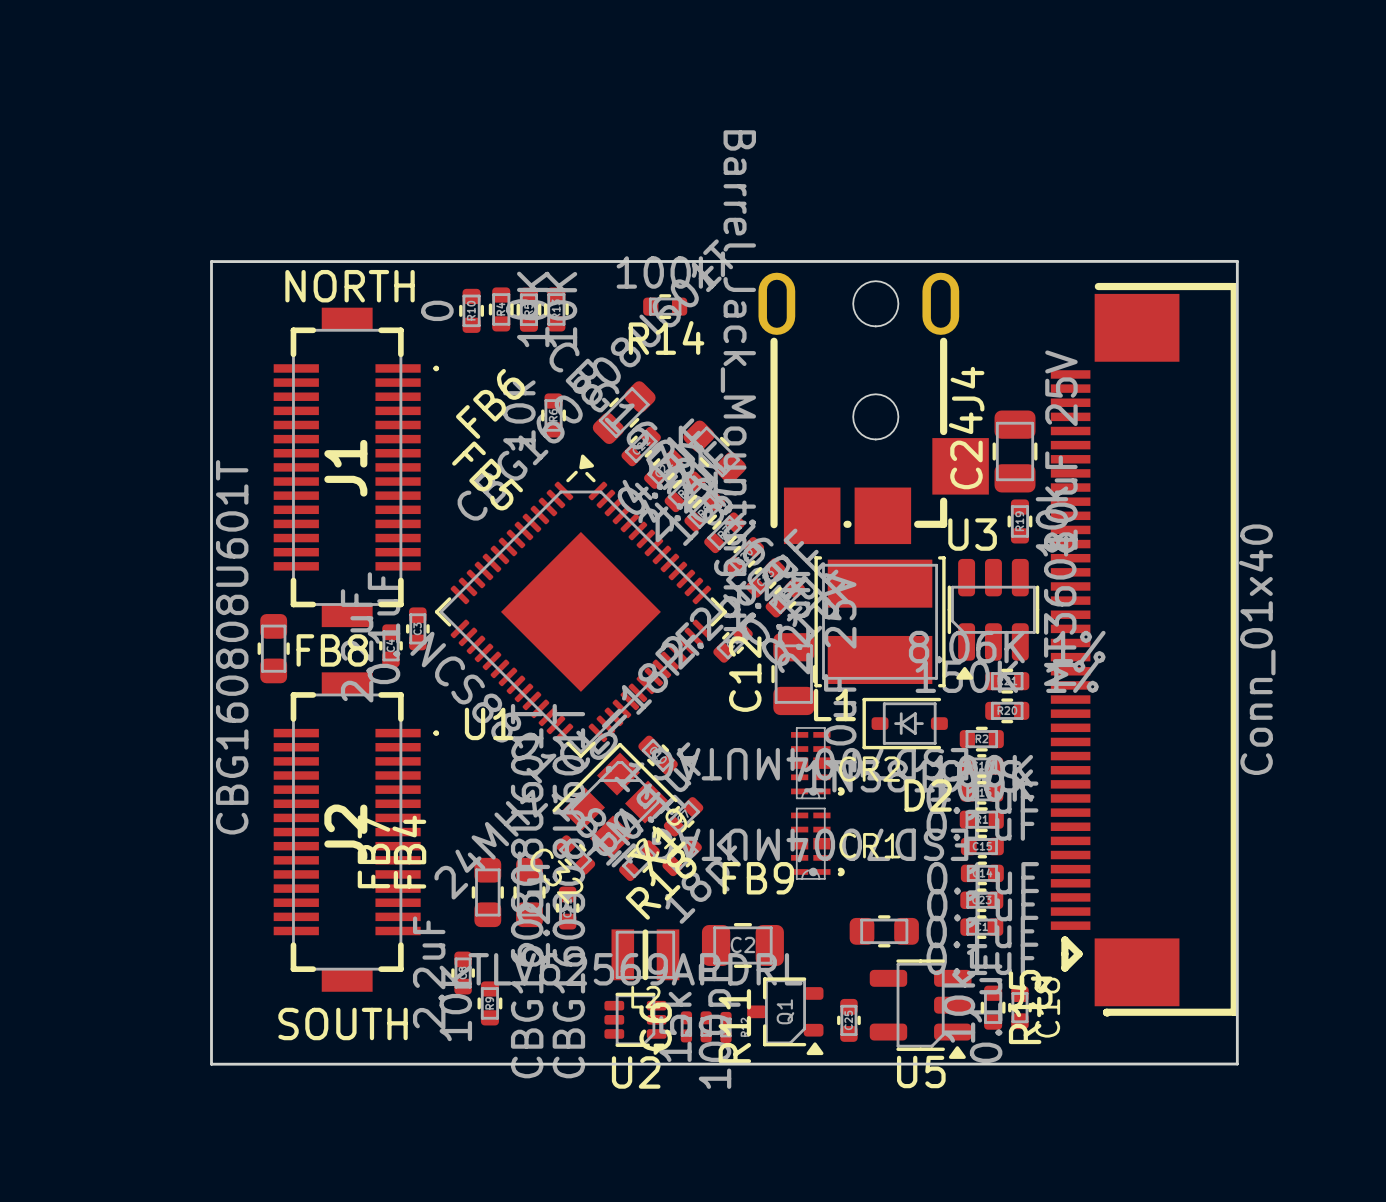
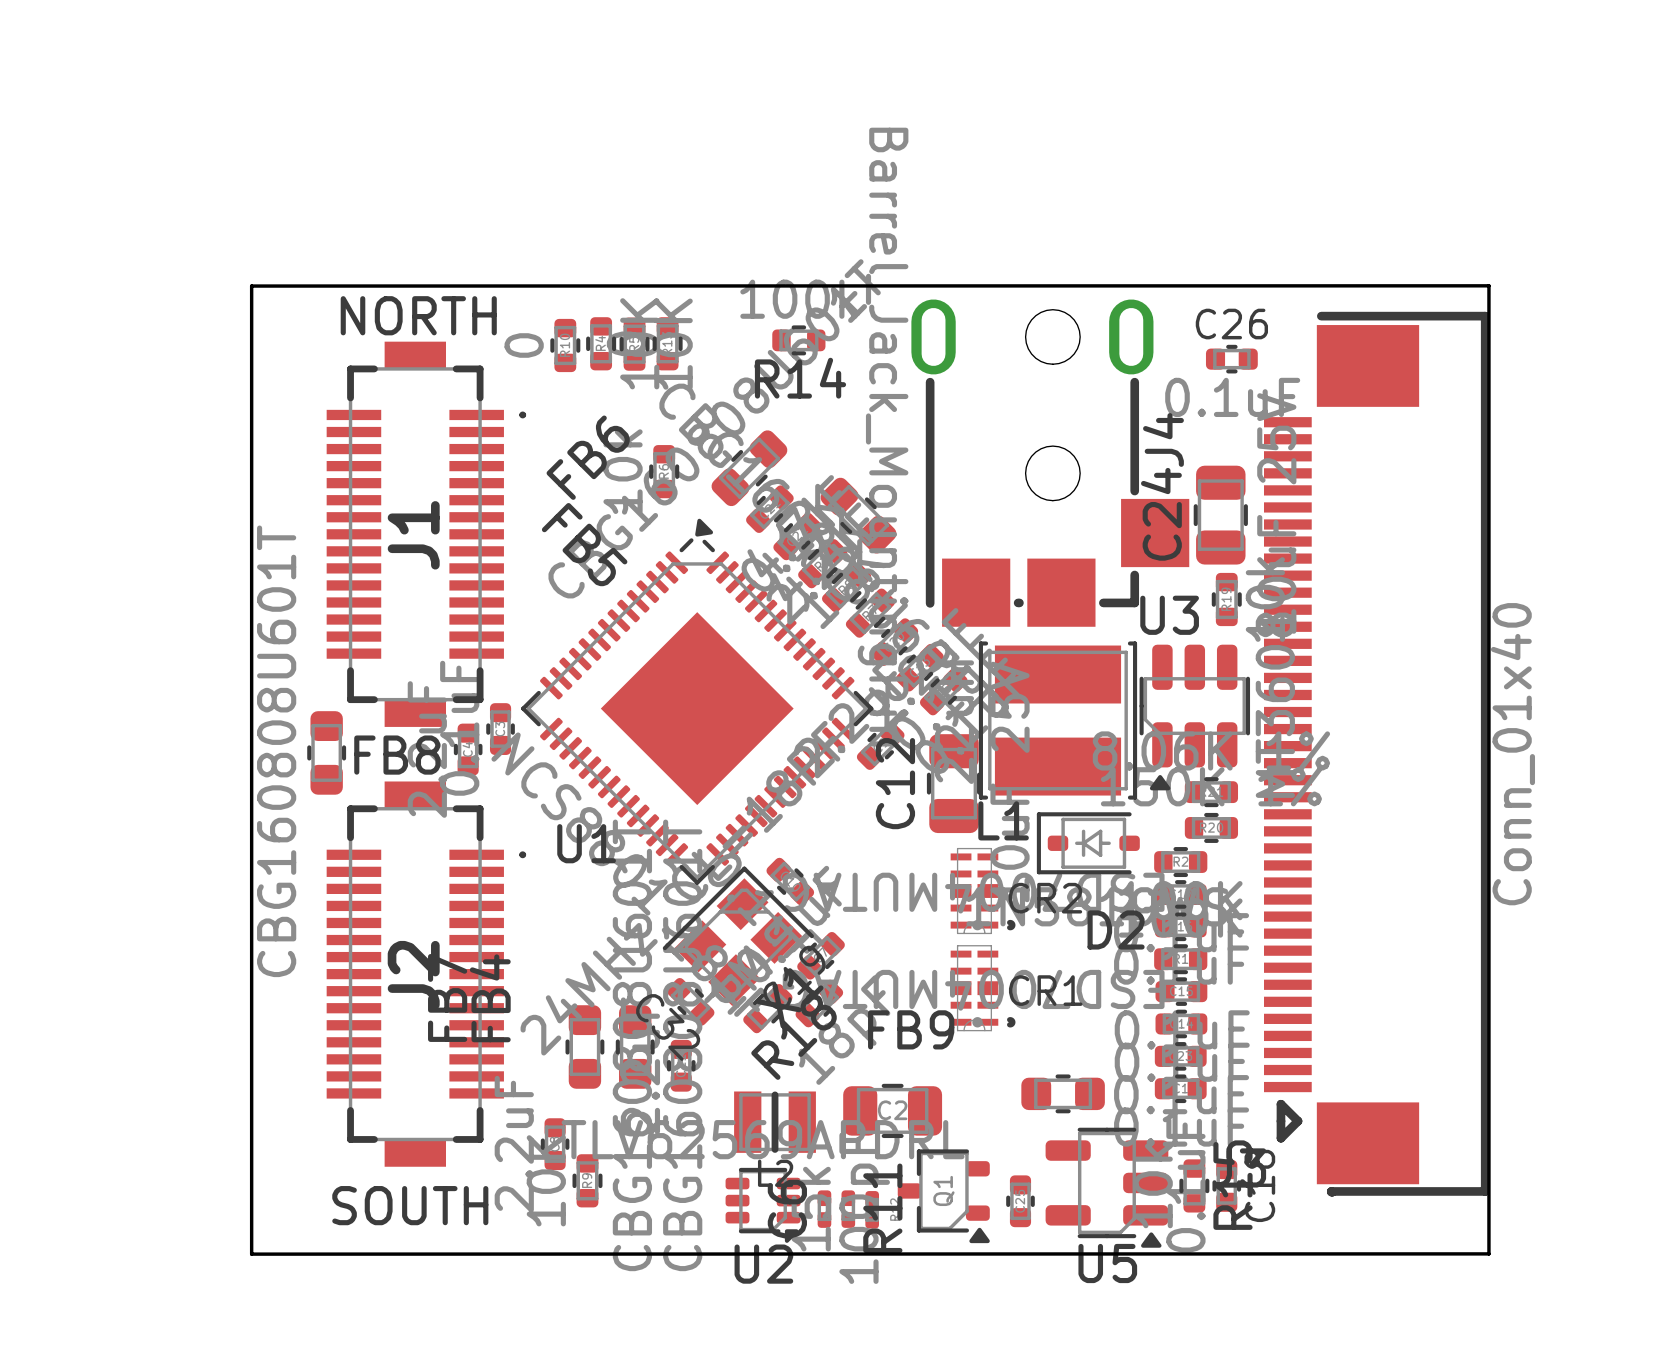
C26: none -> 0.1uF (1231, 359)

